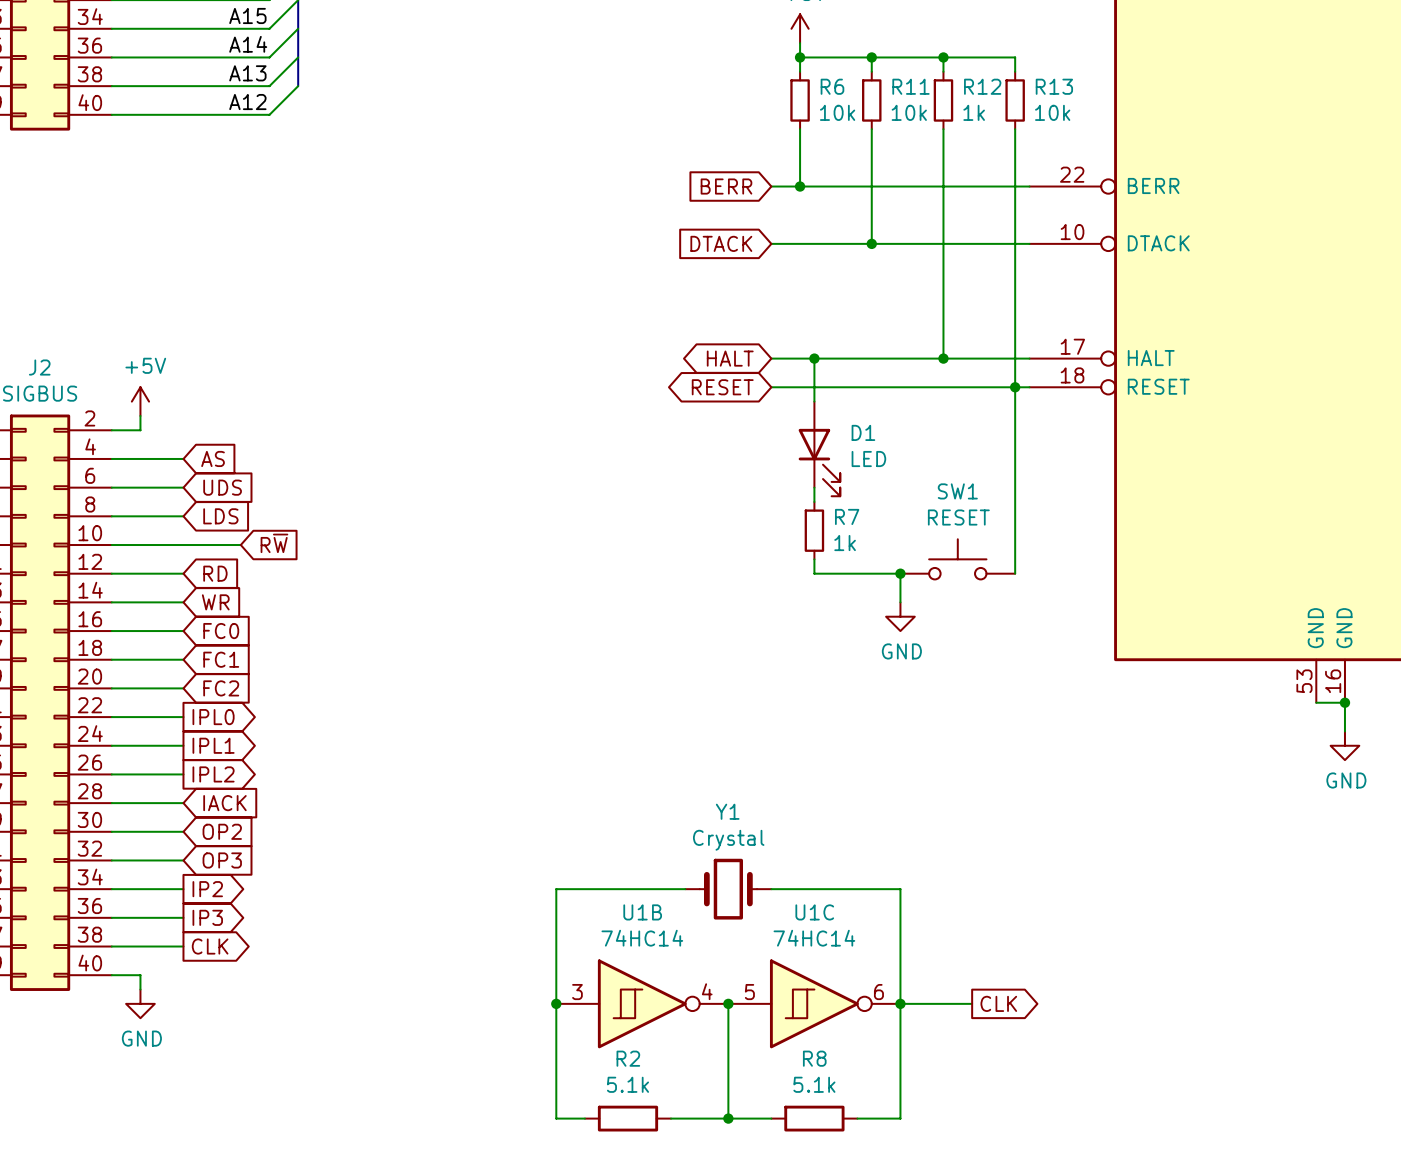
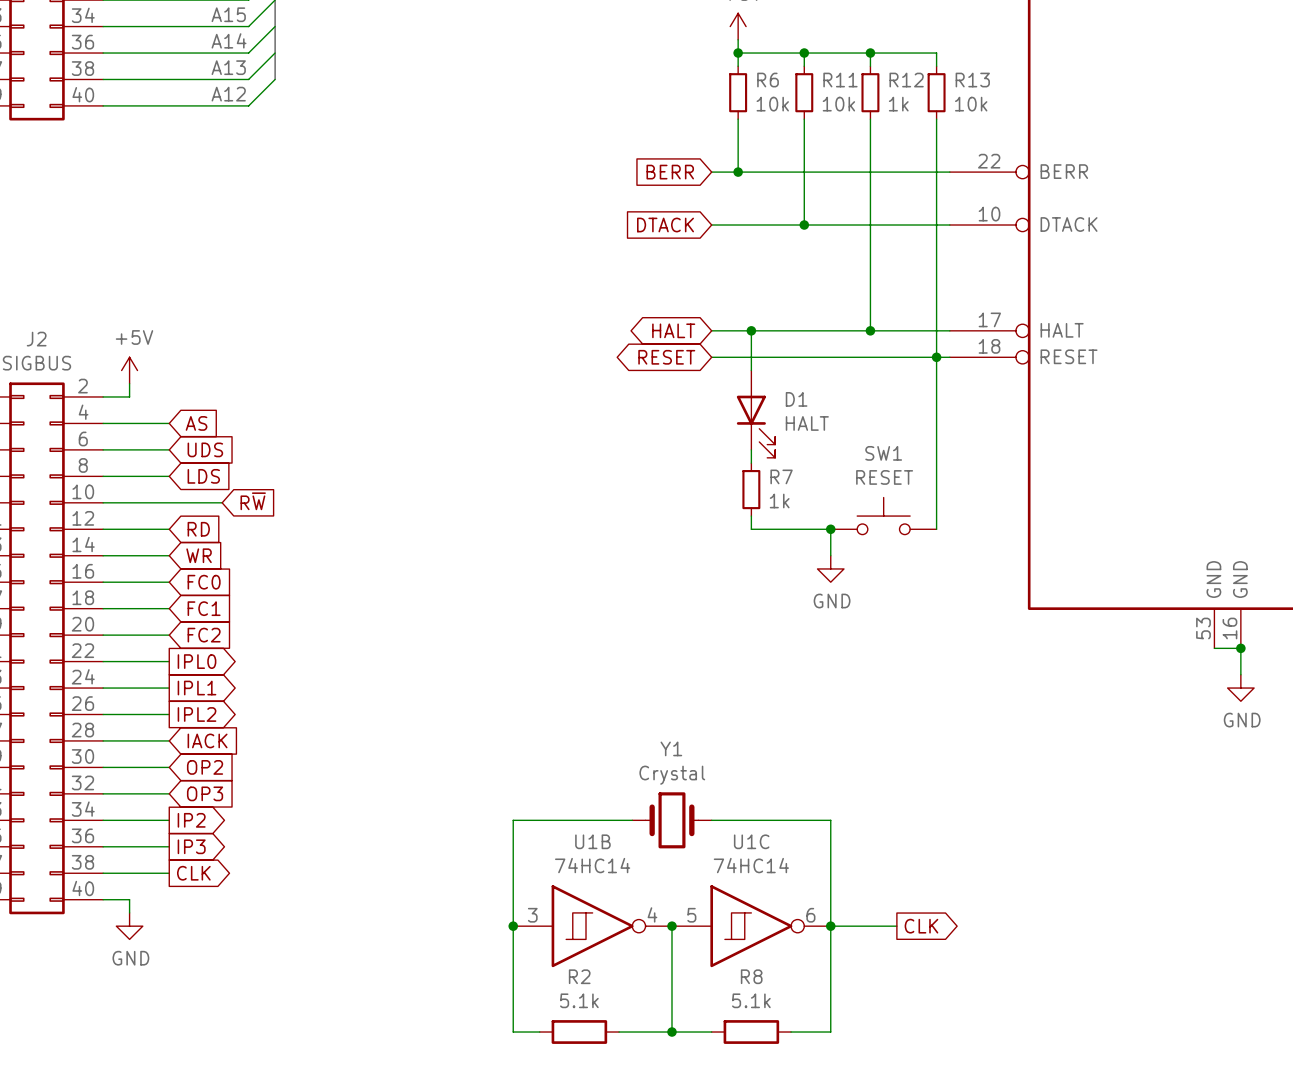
D1 value: LED (868, 459) -> HALT (807, 423)

